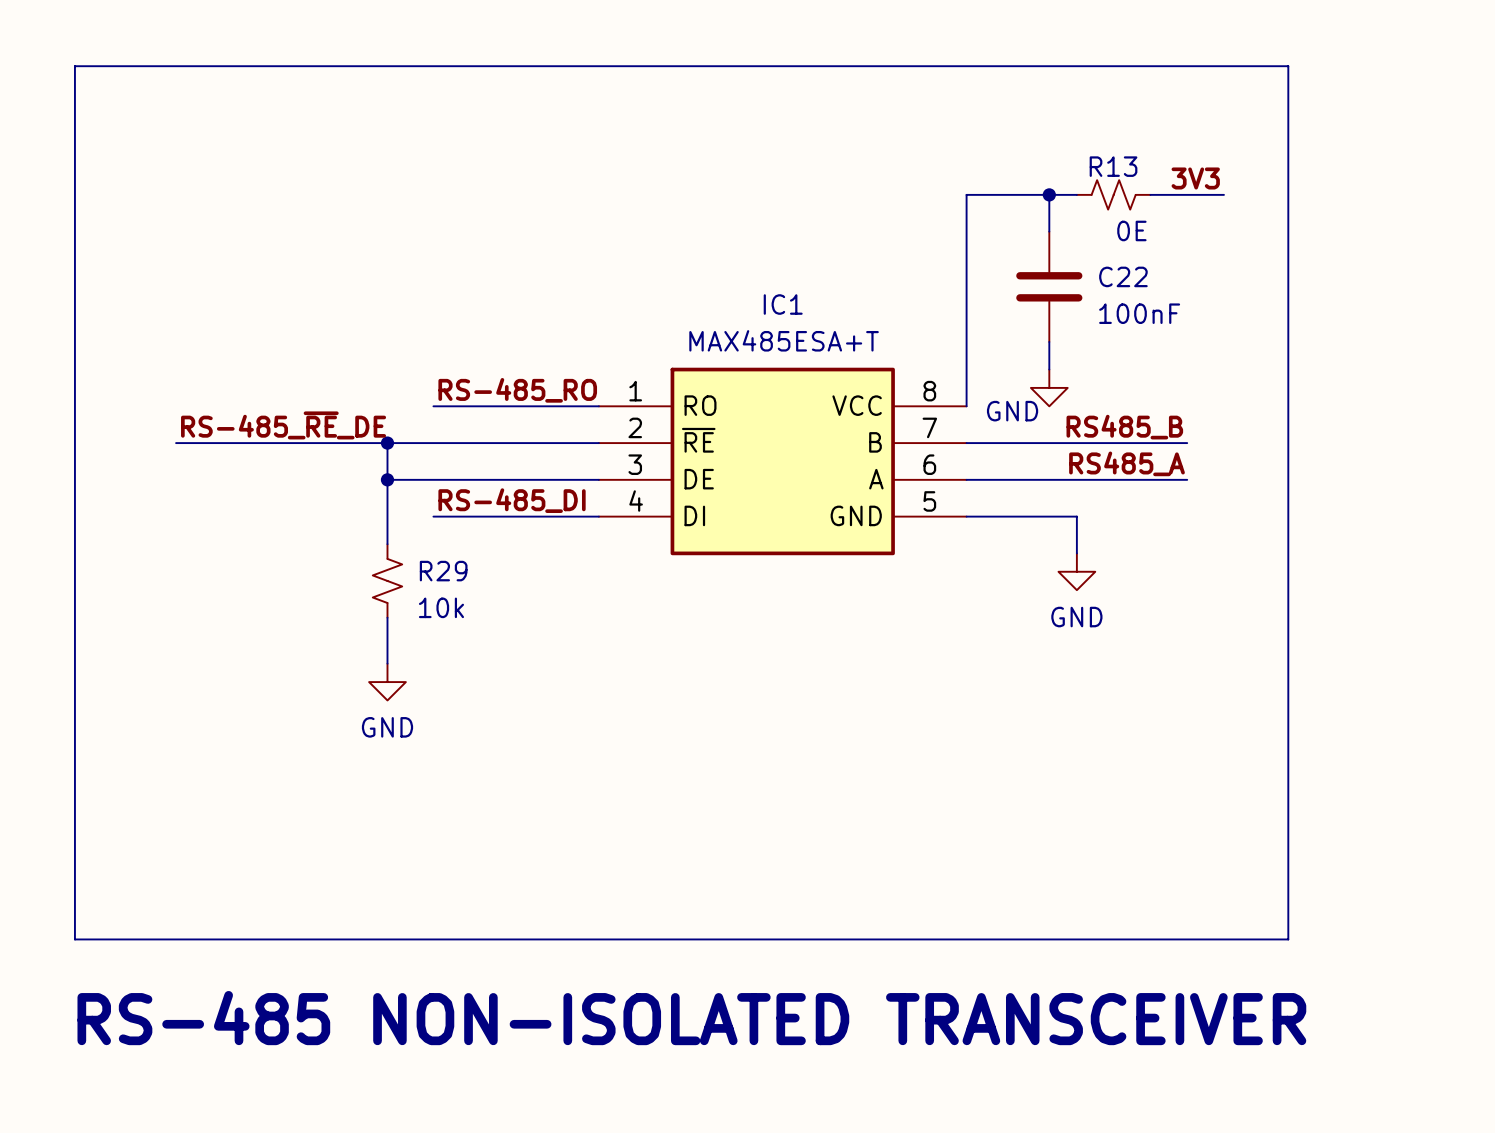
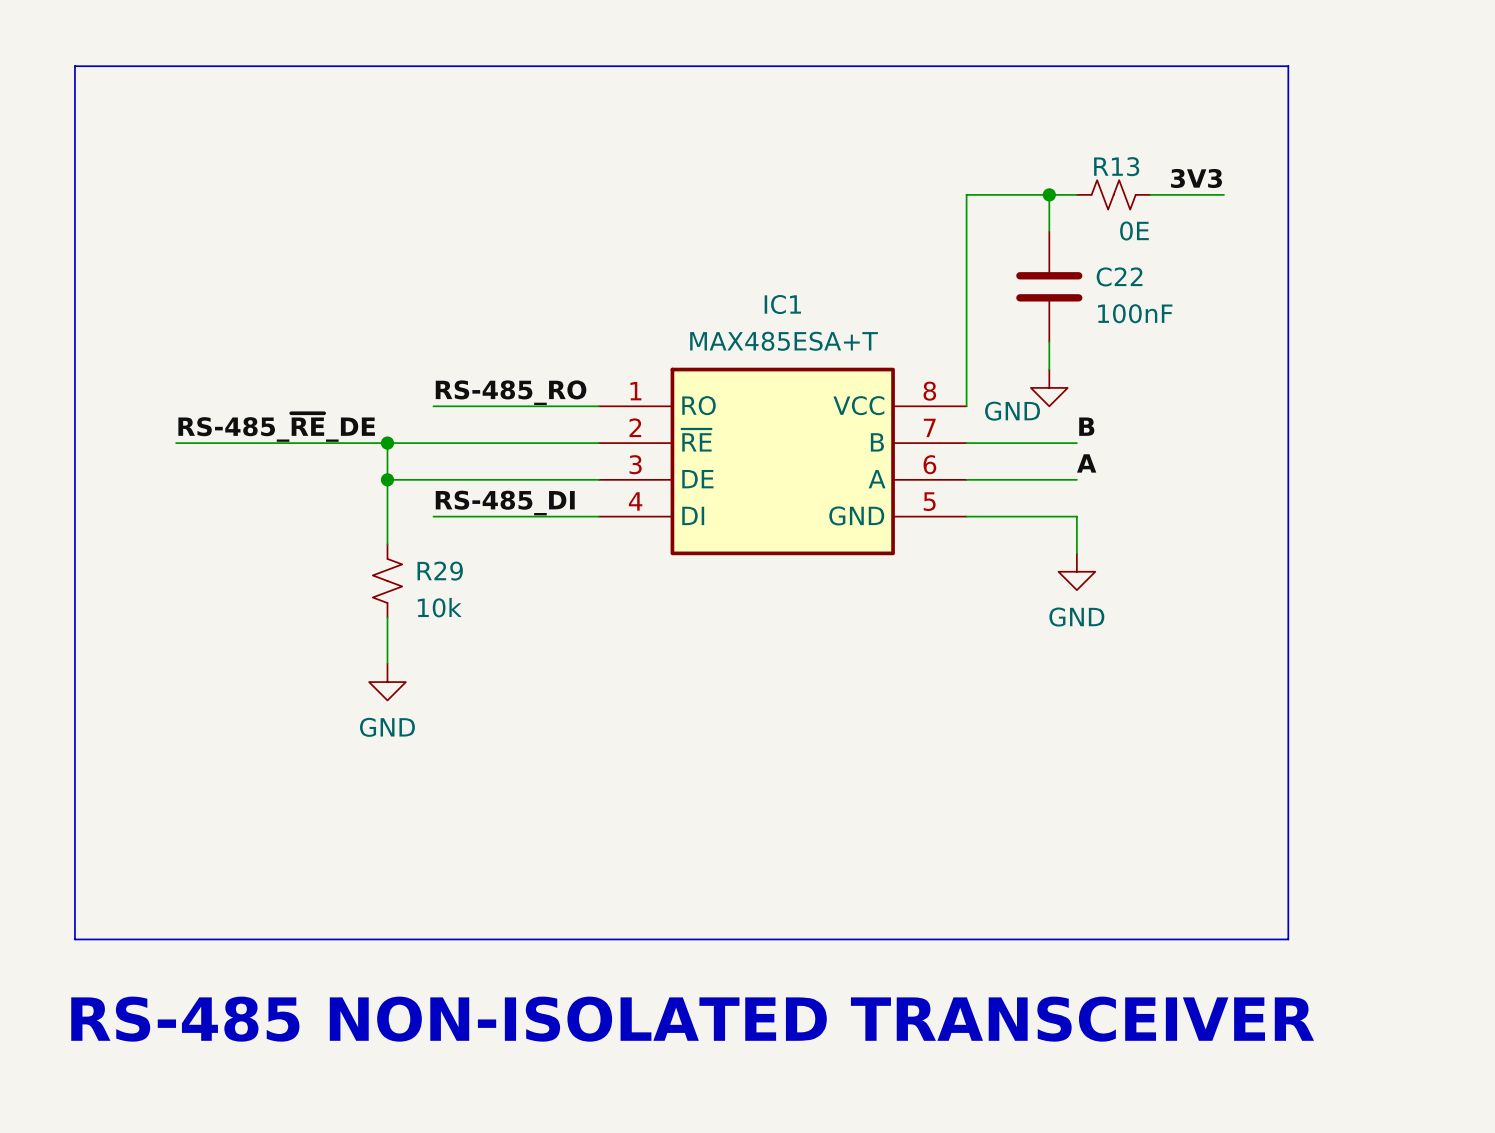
label: none -> B (1086, 426)
label: RS485_B (1124, 427) -> none
wire: (1076, 443) (1187, 443) -> none
label: none -> A (1086, 463)
label: RS485_A (1127, 463) -> none
wire: (1076, 479) (1187, 479) -> none

